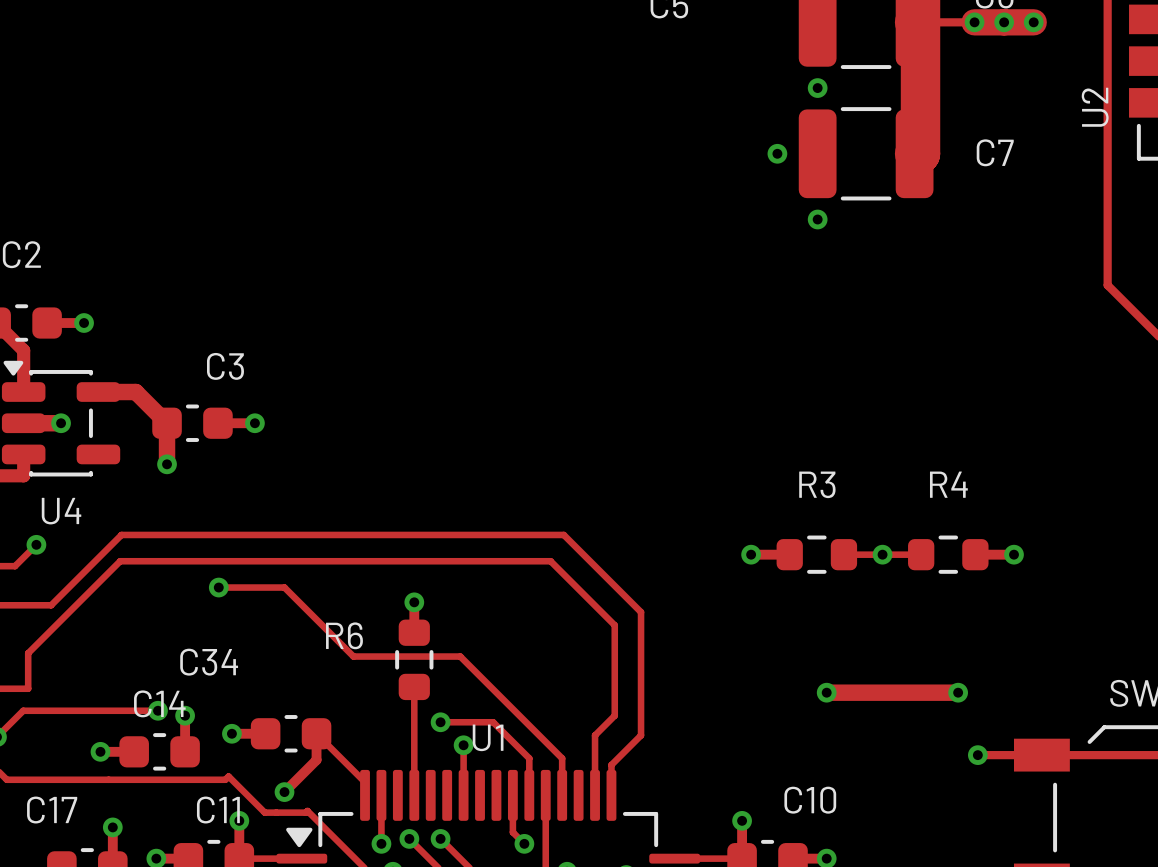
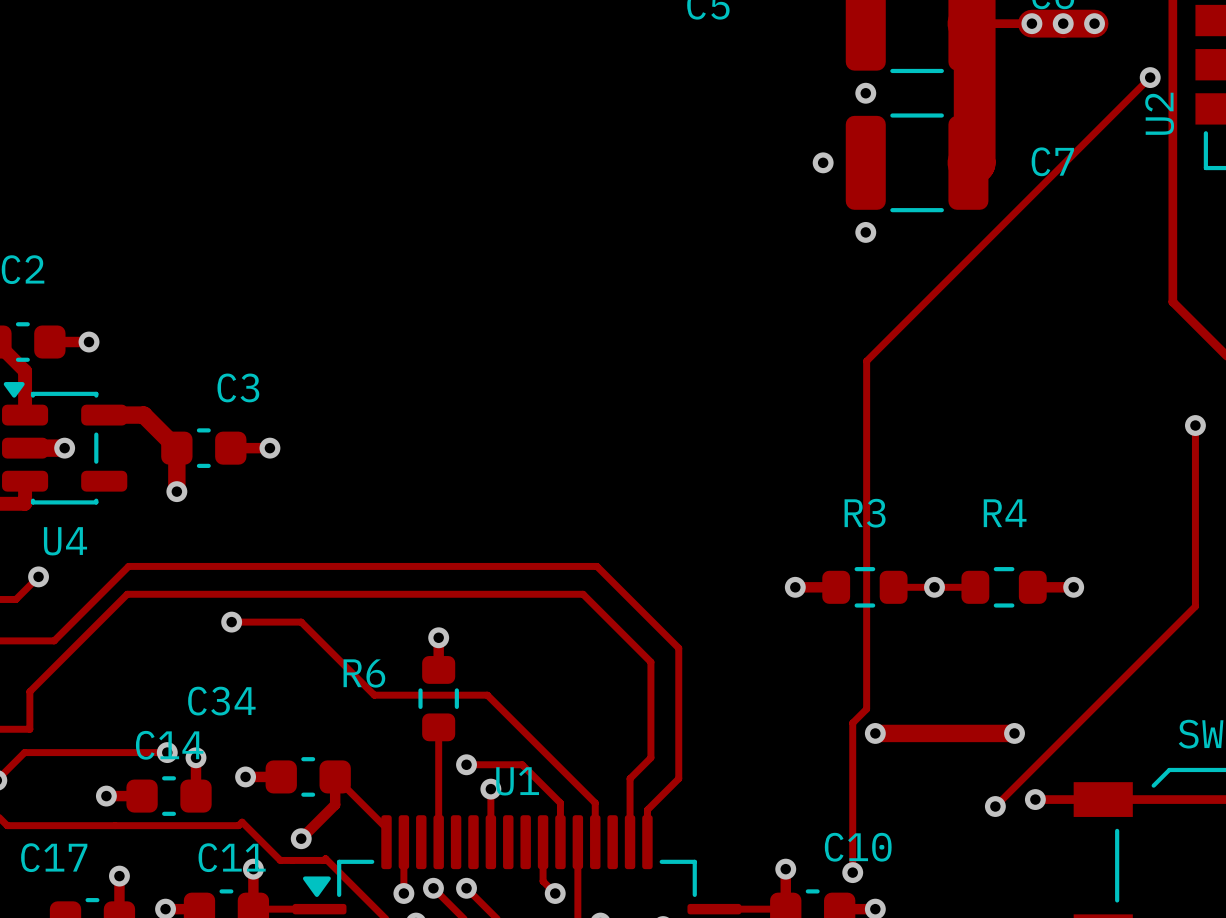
track: none -> (1150, 77) (866, 361) (866, 709) (852, 723) (852, 872)
via: none -> (1150, 77)
track: none -> (1195, 425) (1195, 606) (995, 806)
via: none -> (1195, 425)
via: none -> (995, 806)
via: none -> (852, 872)

